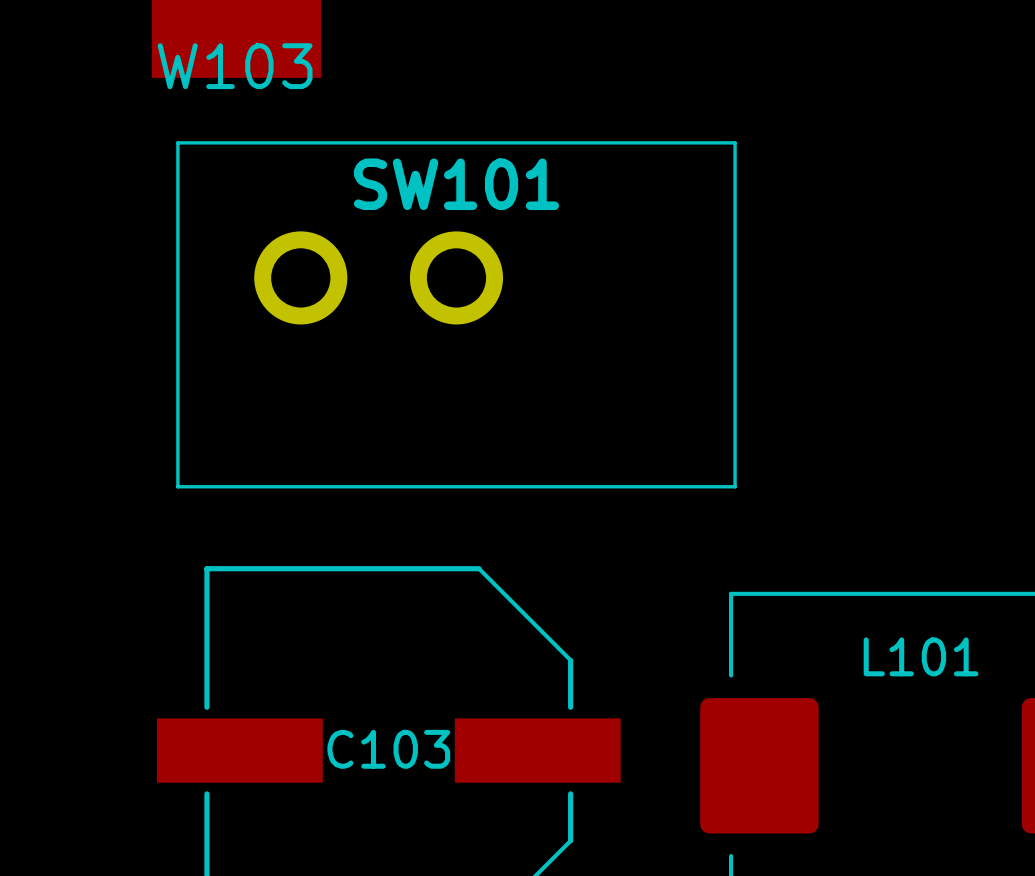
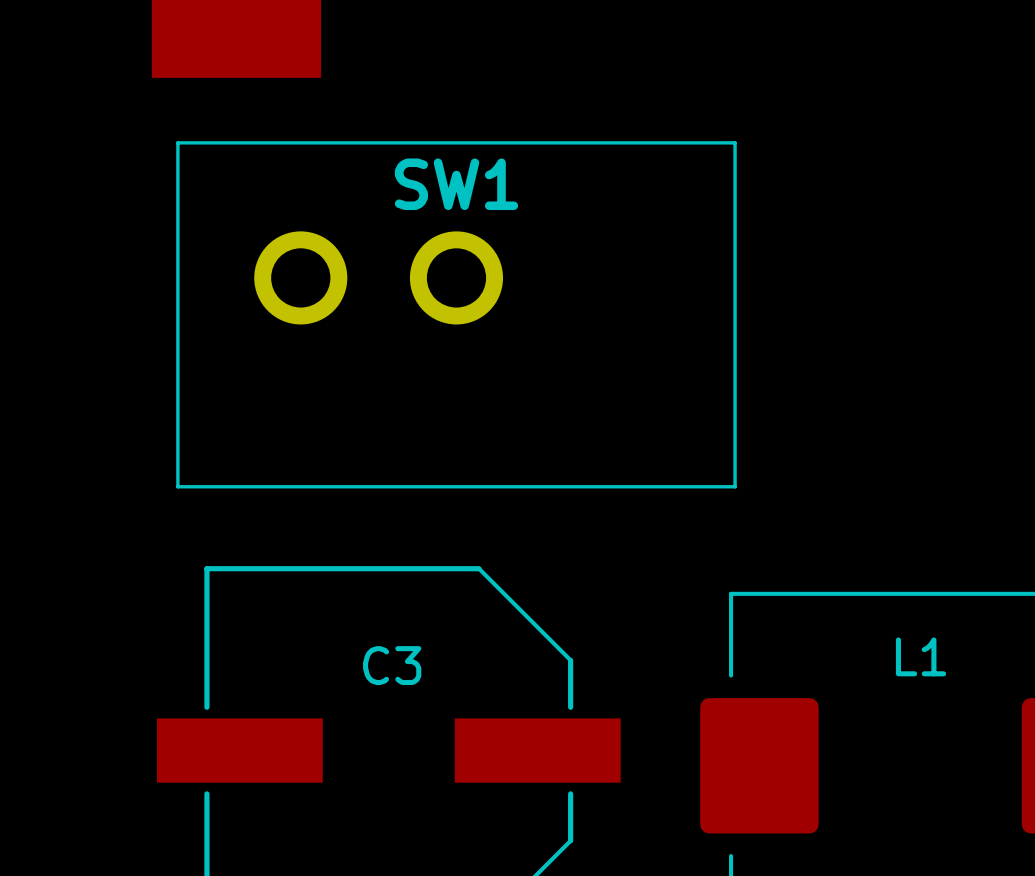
W103 name: W103 (235, 66) -> none
SW101 name: SW101 (456, 184) -> SW1 (456, 184)
L101 name: L101 (921, 656) -> L1 (921, 656)
C103 name: C103 (388, 749) -> C3 (392, 665)

